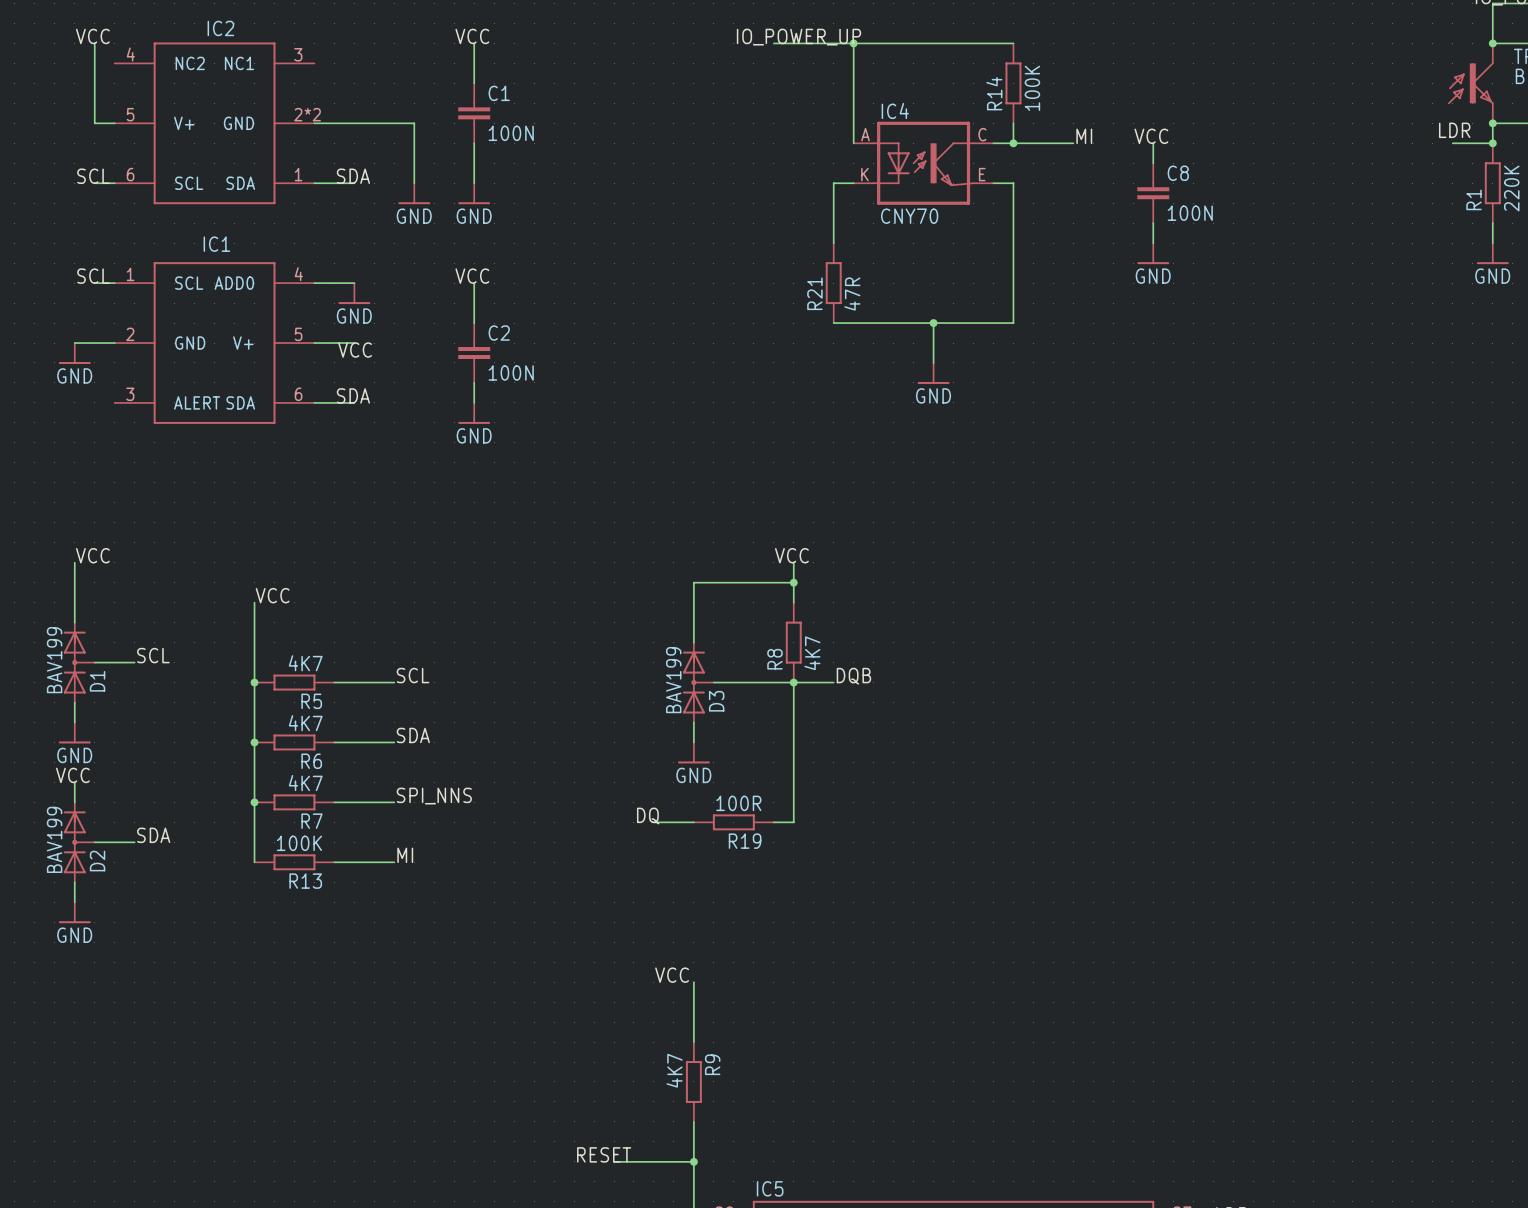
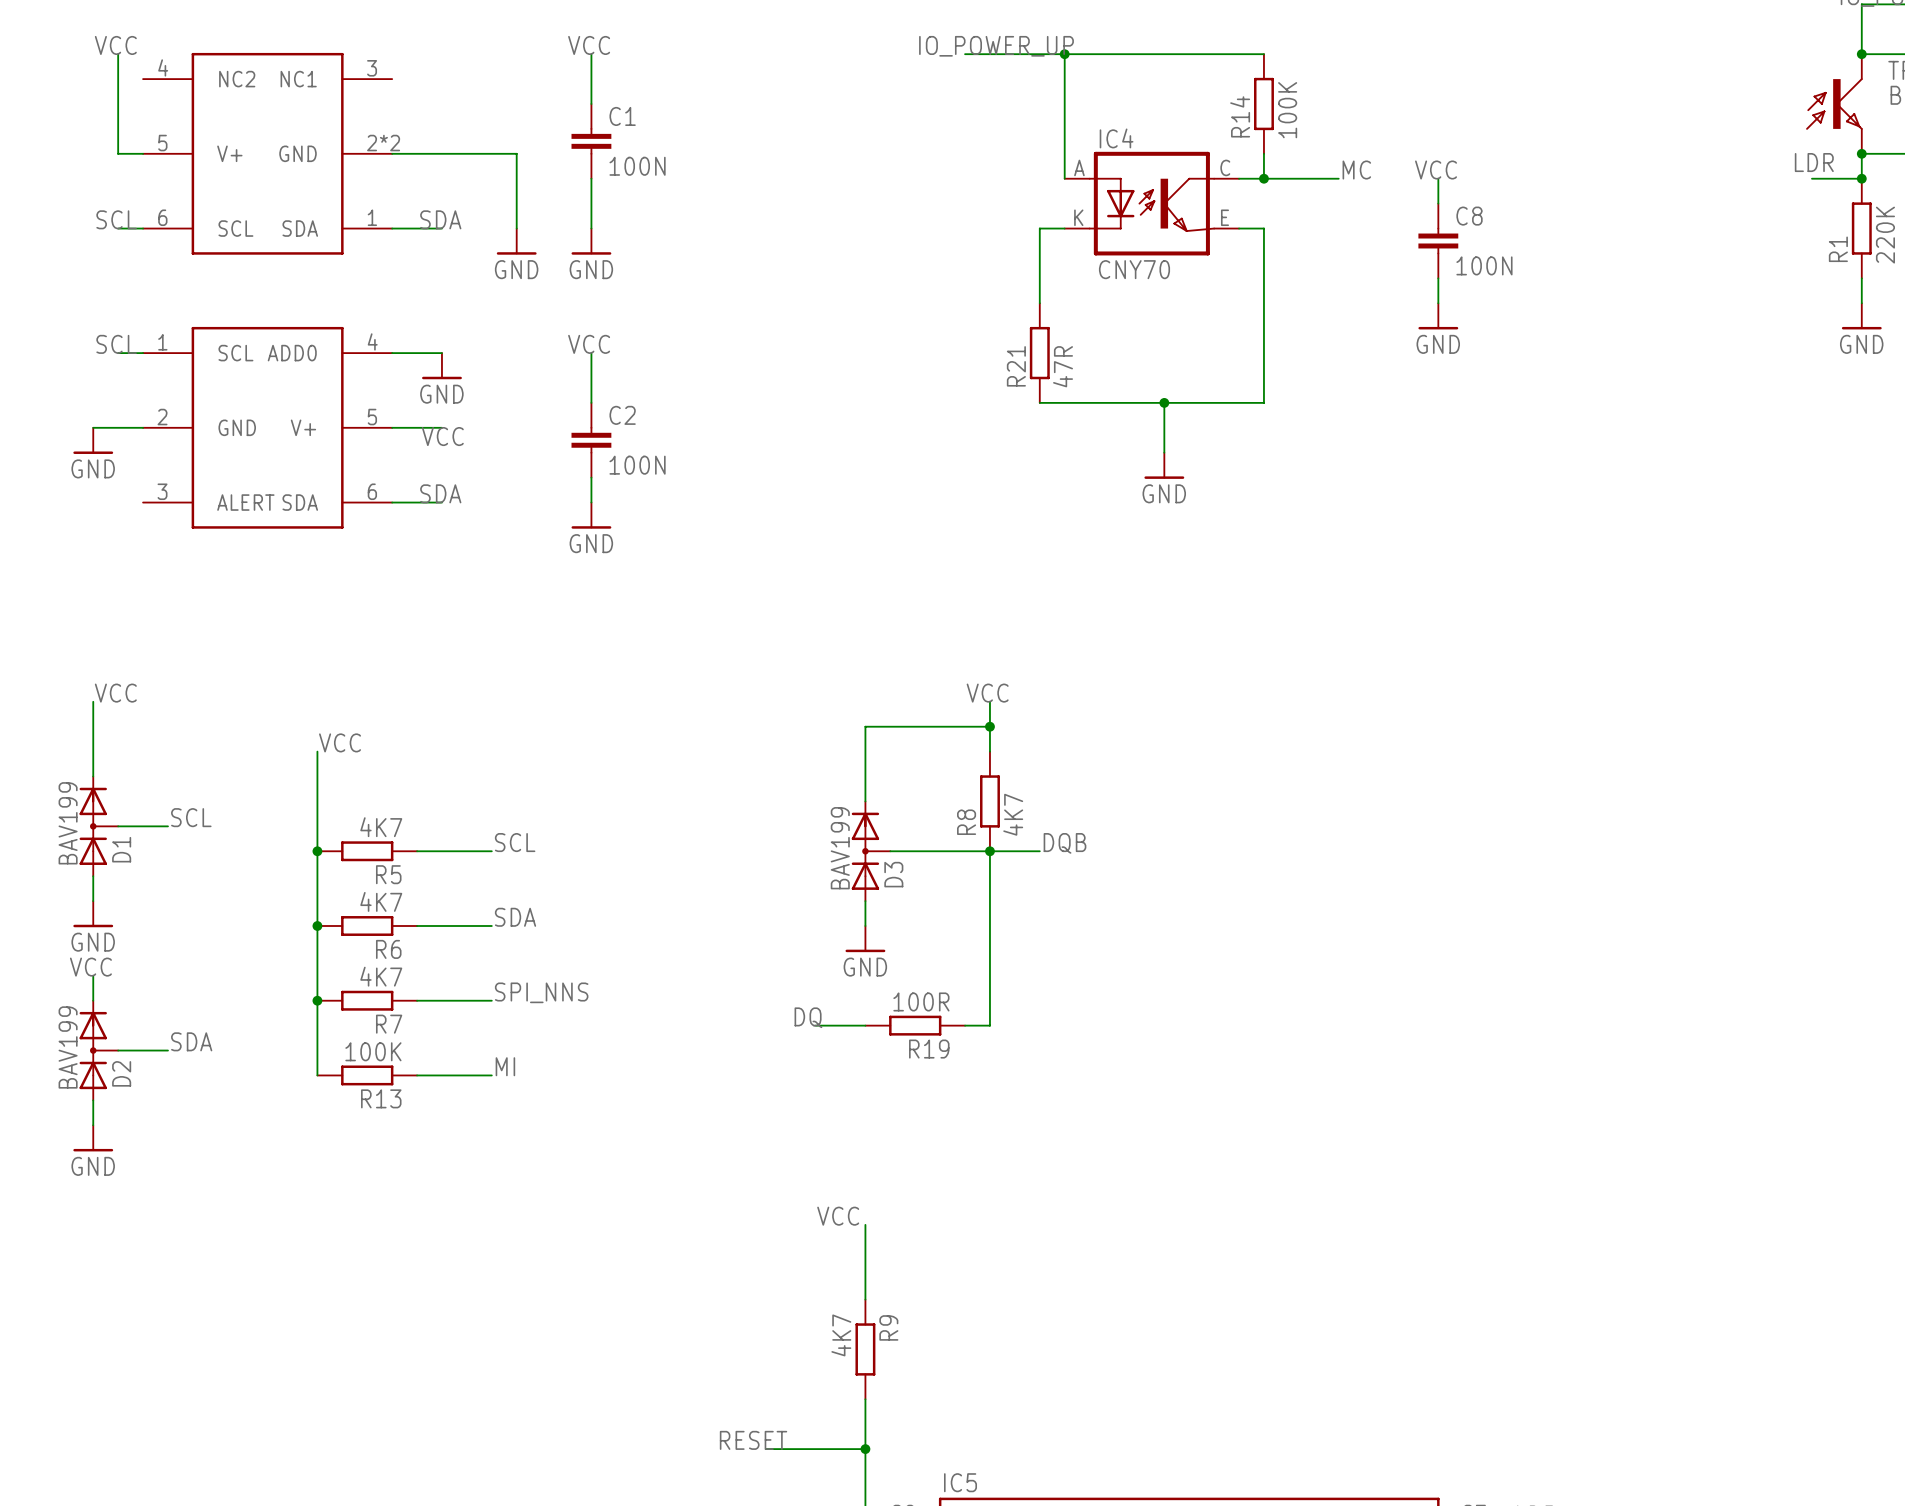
text: IC2 (220, 28) -> none
label: MI (1084, 136) -> MC (1356, 170)
text: IC1 (216, 244) -> none

